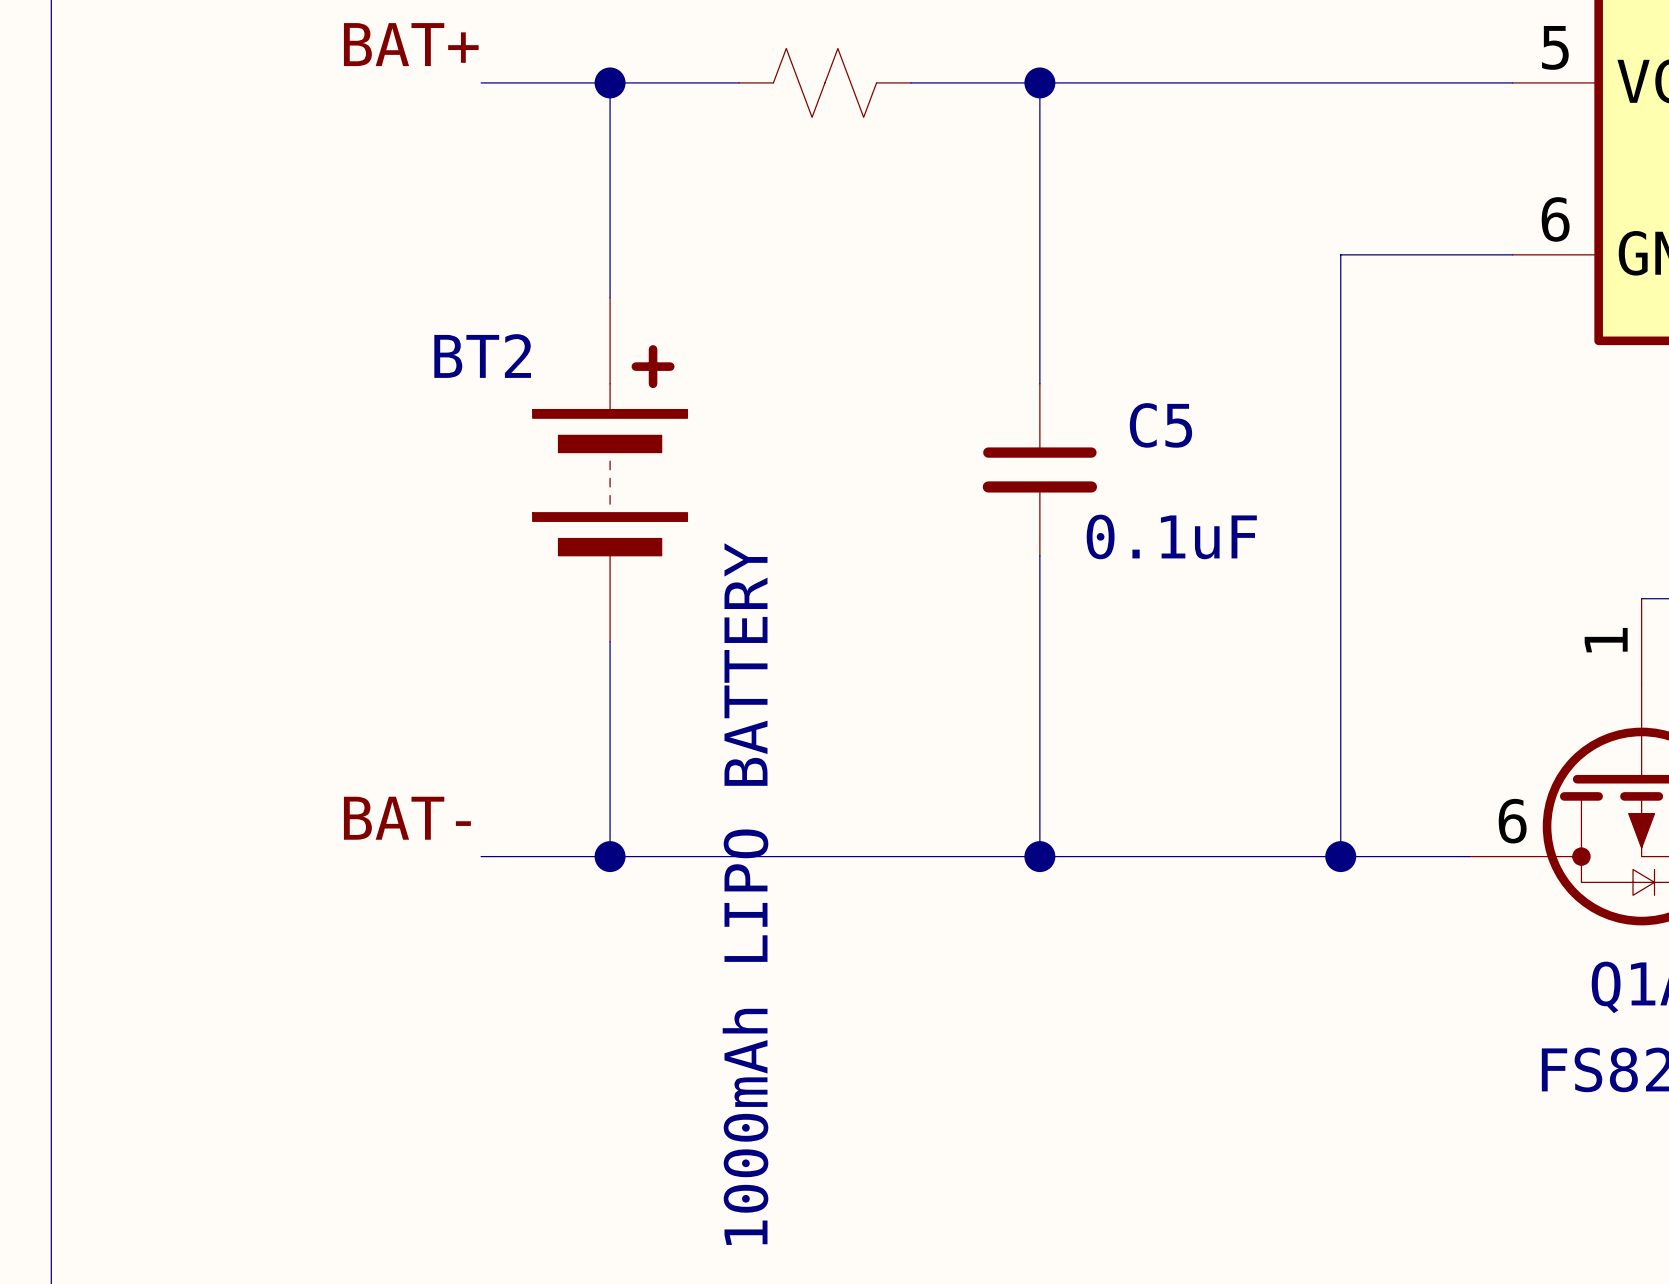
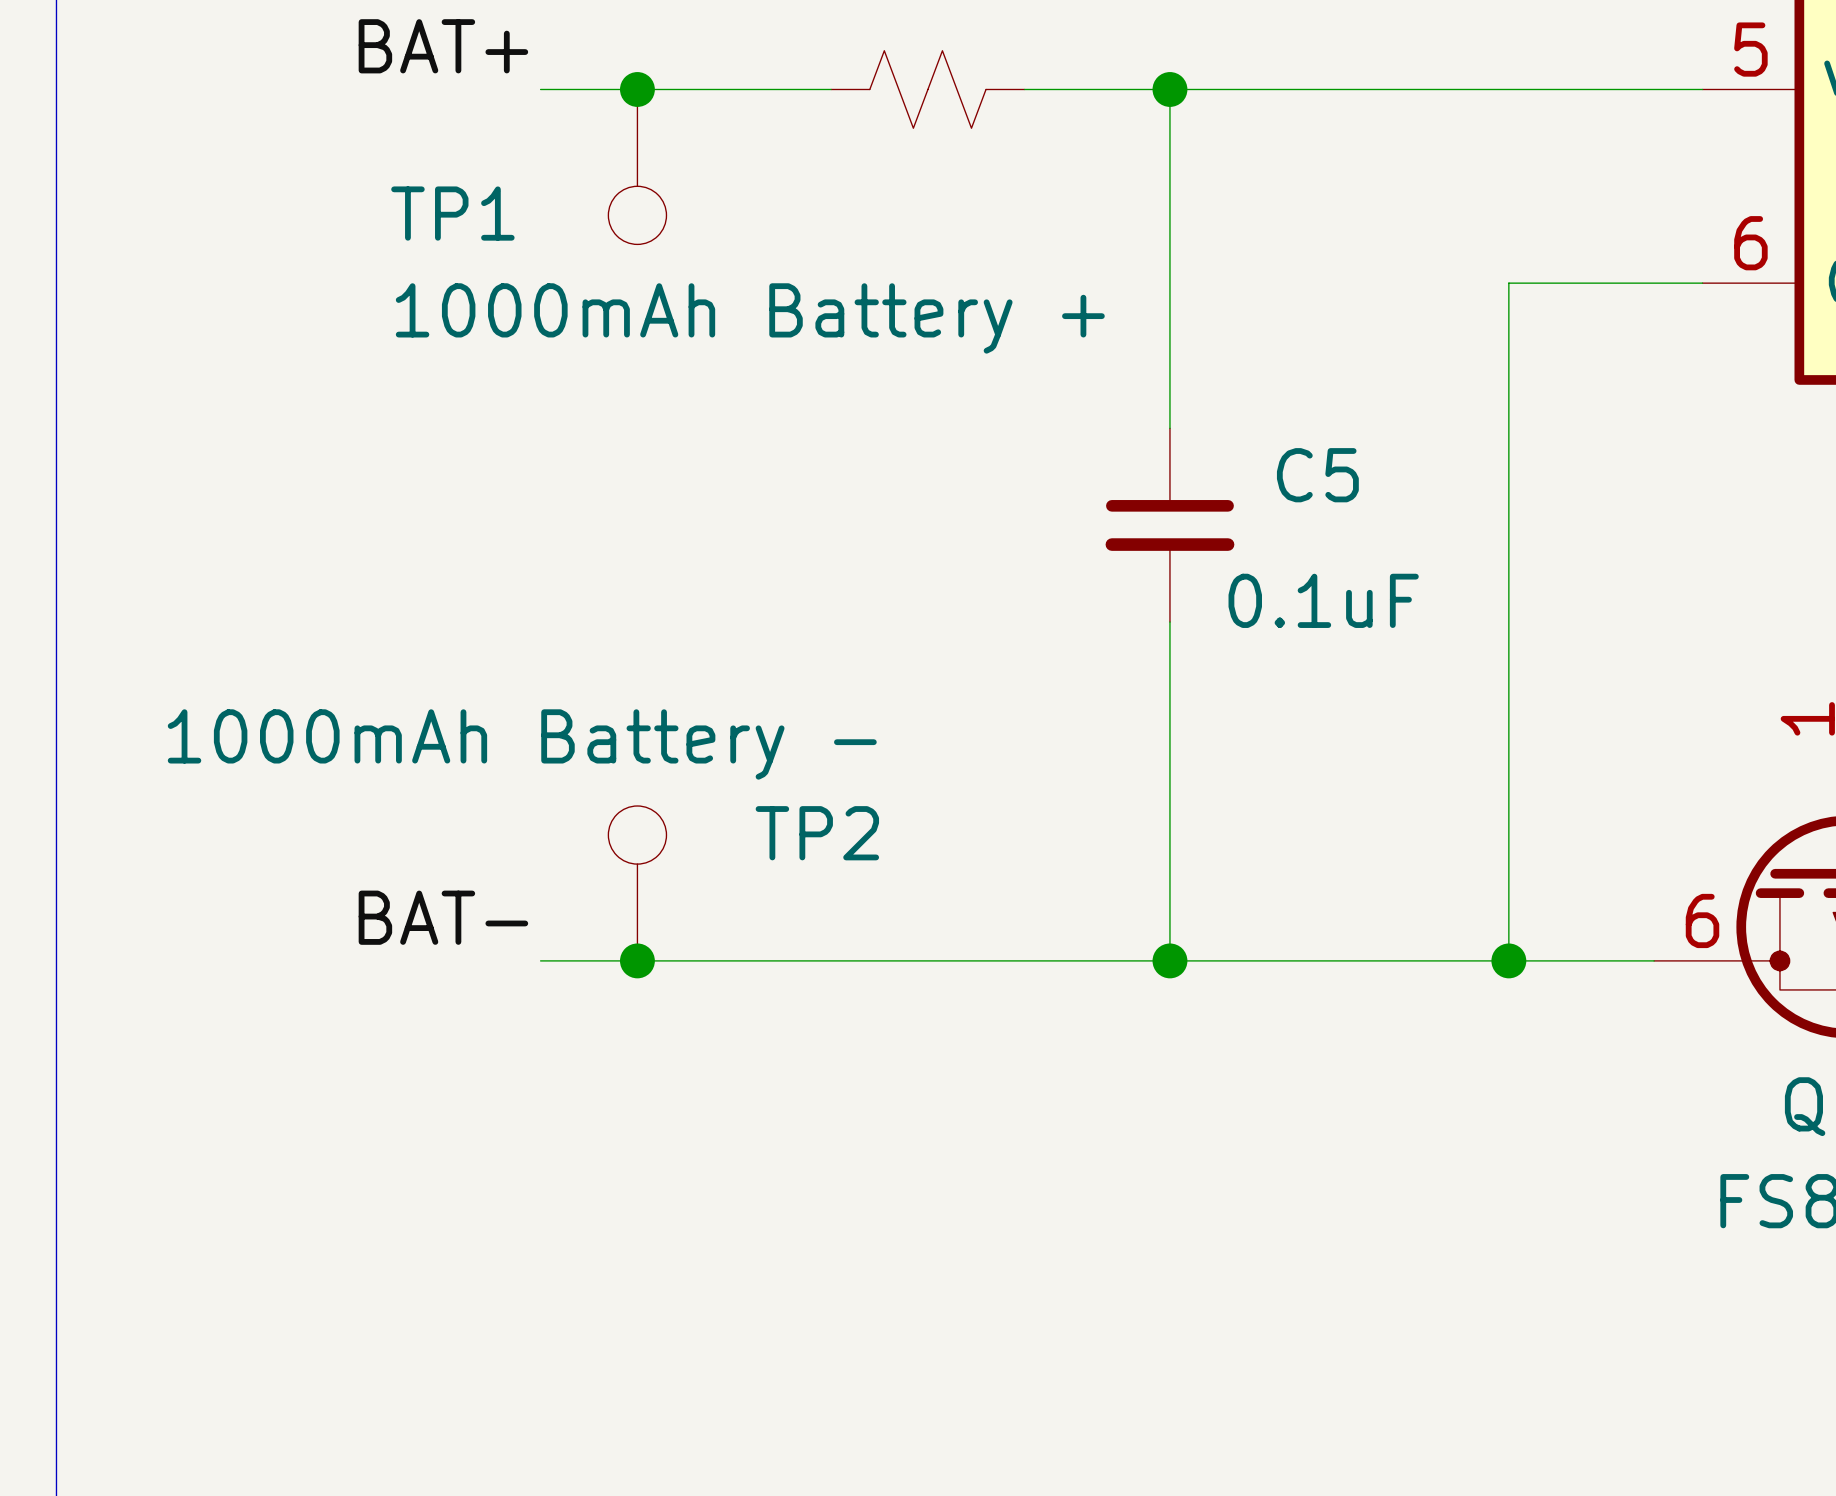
wire: (610, 82) (610, 297) -> none
junction position: (610, 82) -> (637, 89)
TP1: none -> 1000mAh Battery + (637, 166)
BT2: 1000mAh LIPO BATTERY (610, 469) -> none
wire: (610, 641) (610, 856) -> none
TP2: none -> 1000mAh Battery - (637, 883)
junction position: (610, 856) -> (637, 960)

